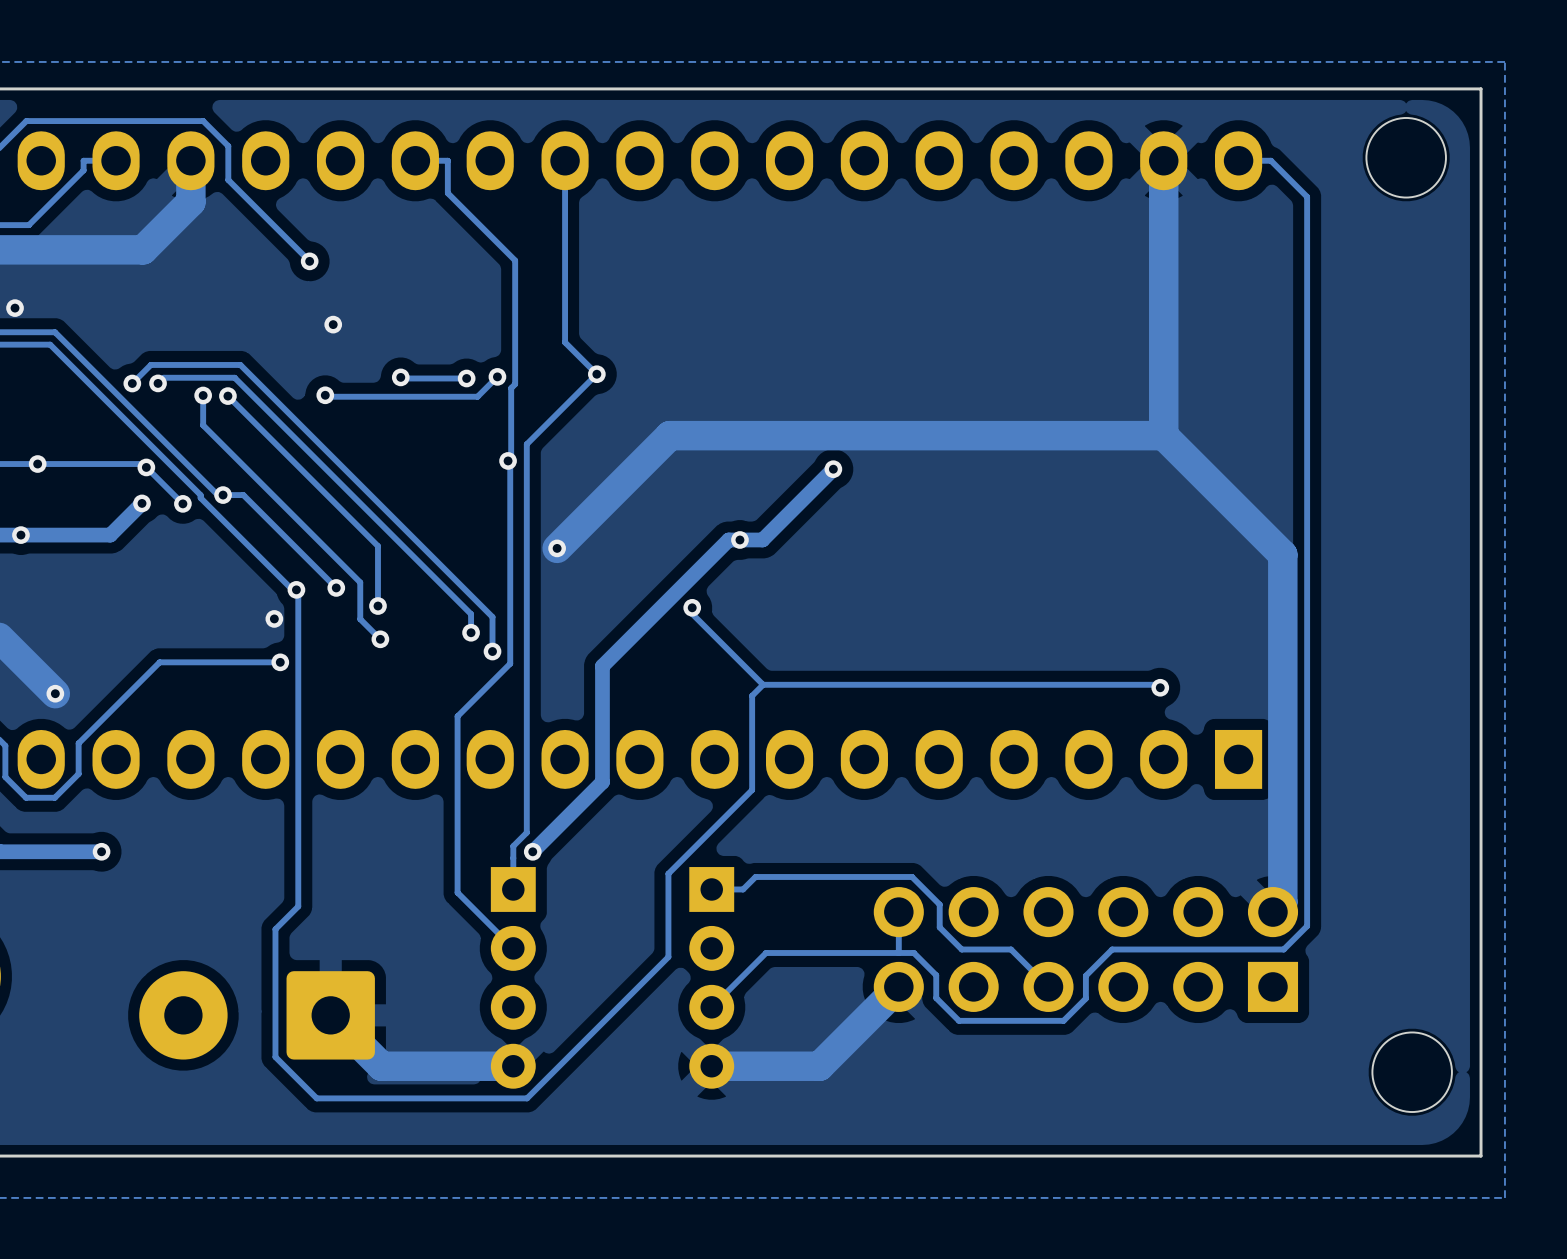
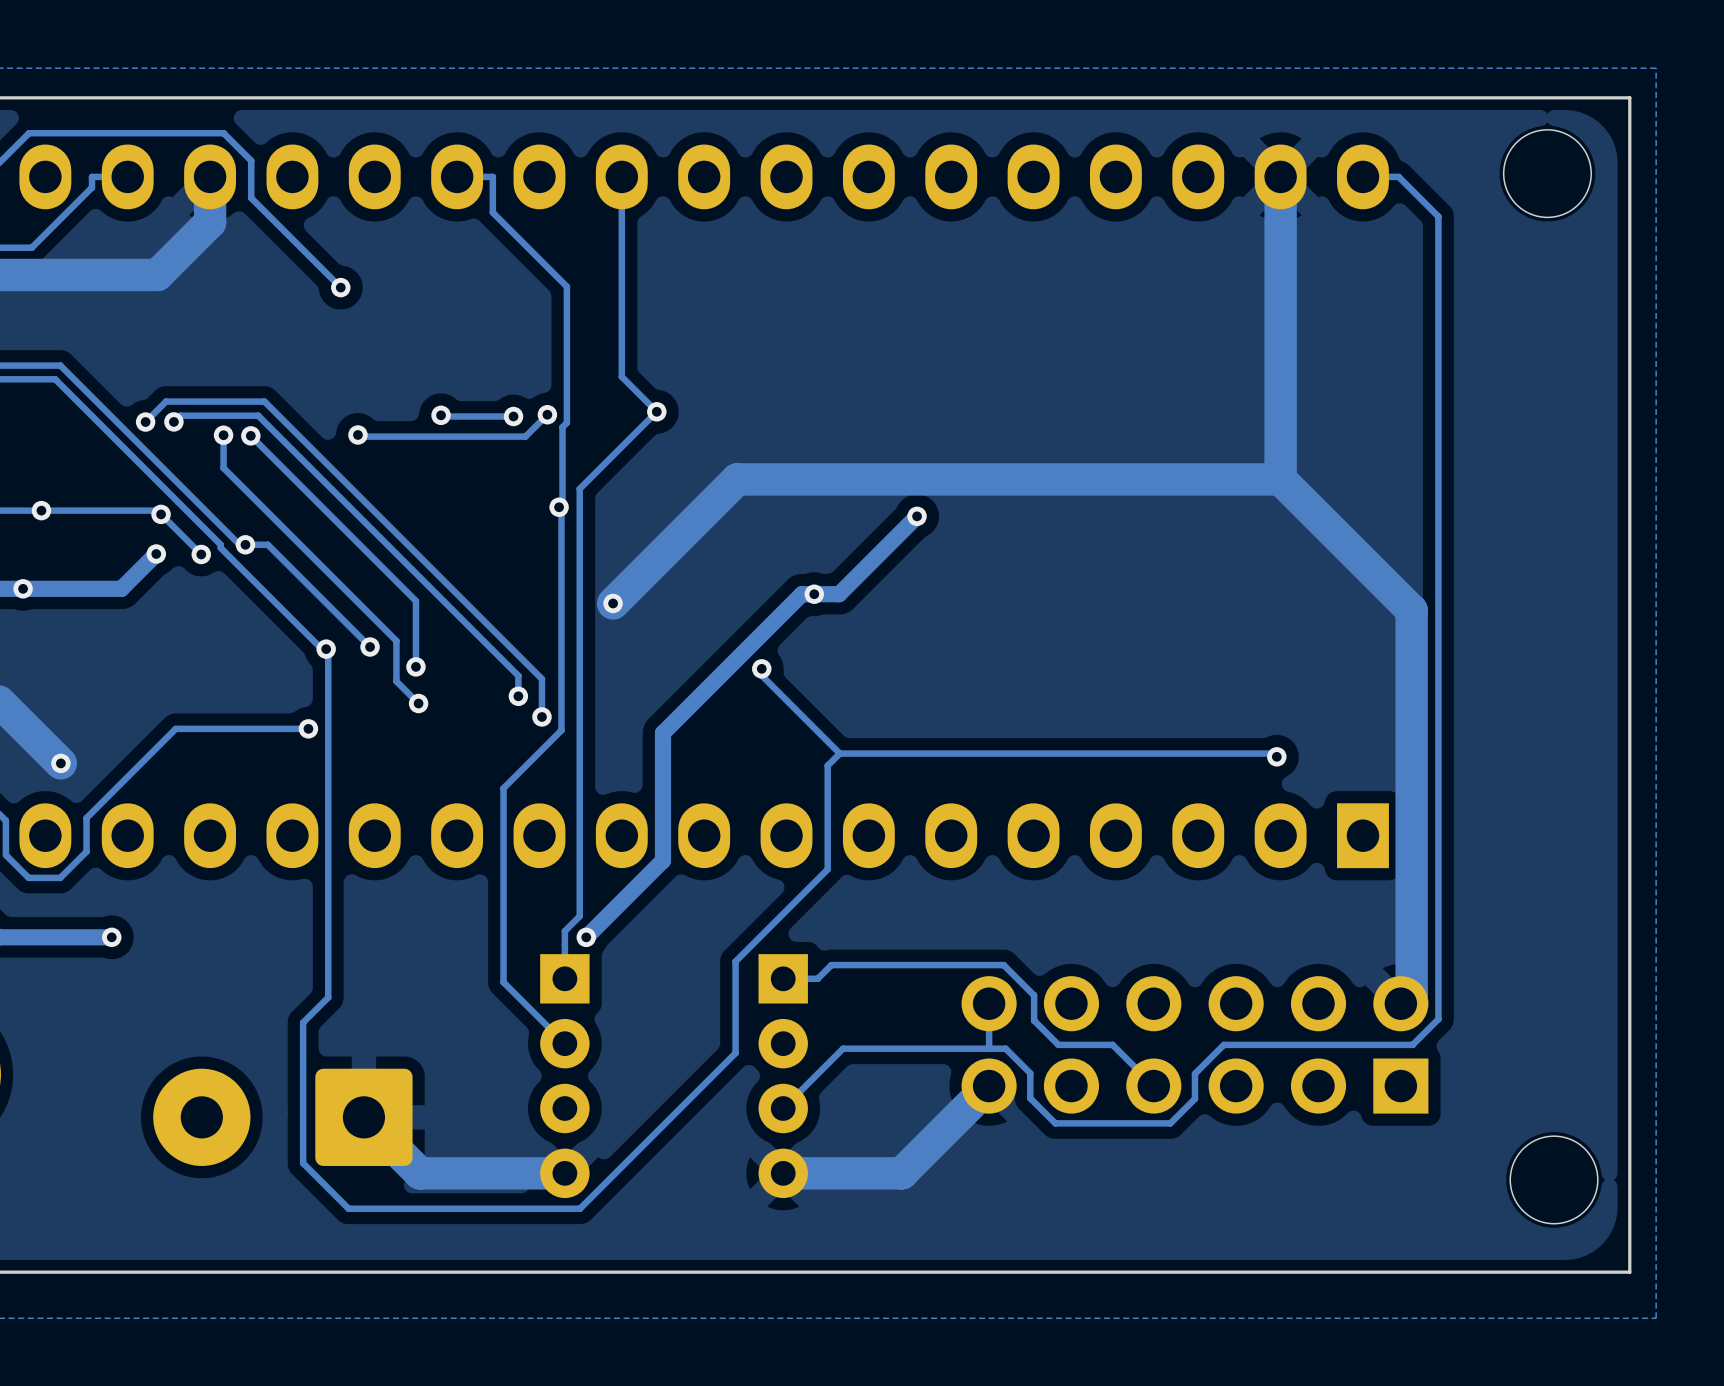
via: (15, 308) -> none
via: (333, 324) -> none
via: (274, 618) -> none

